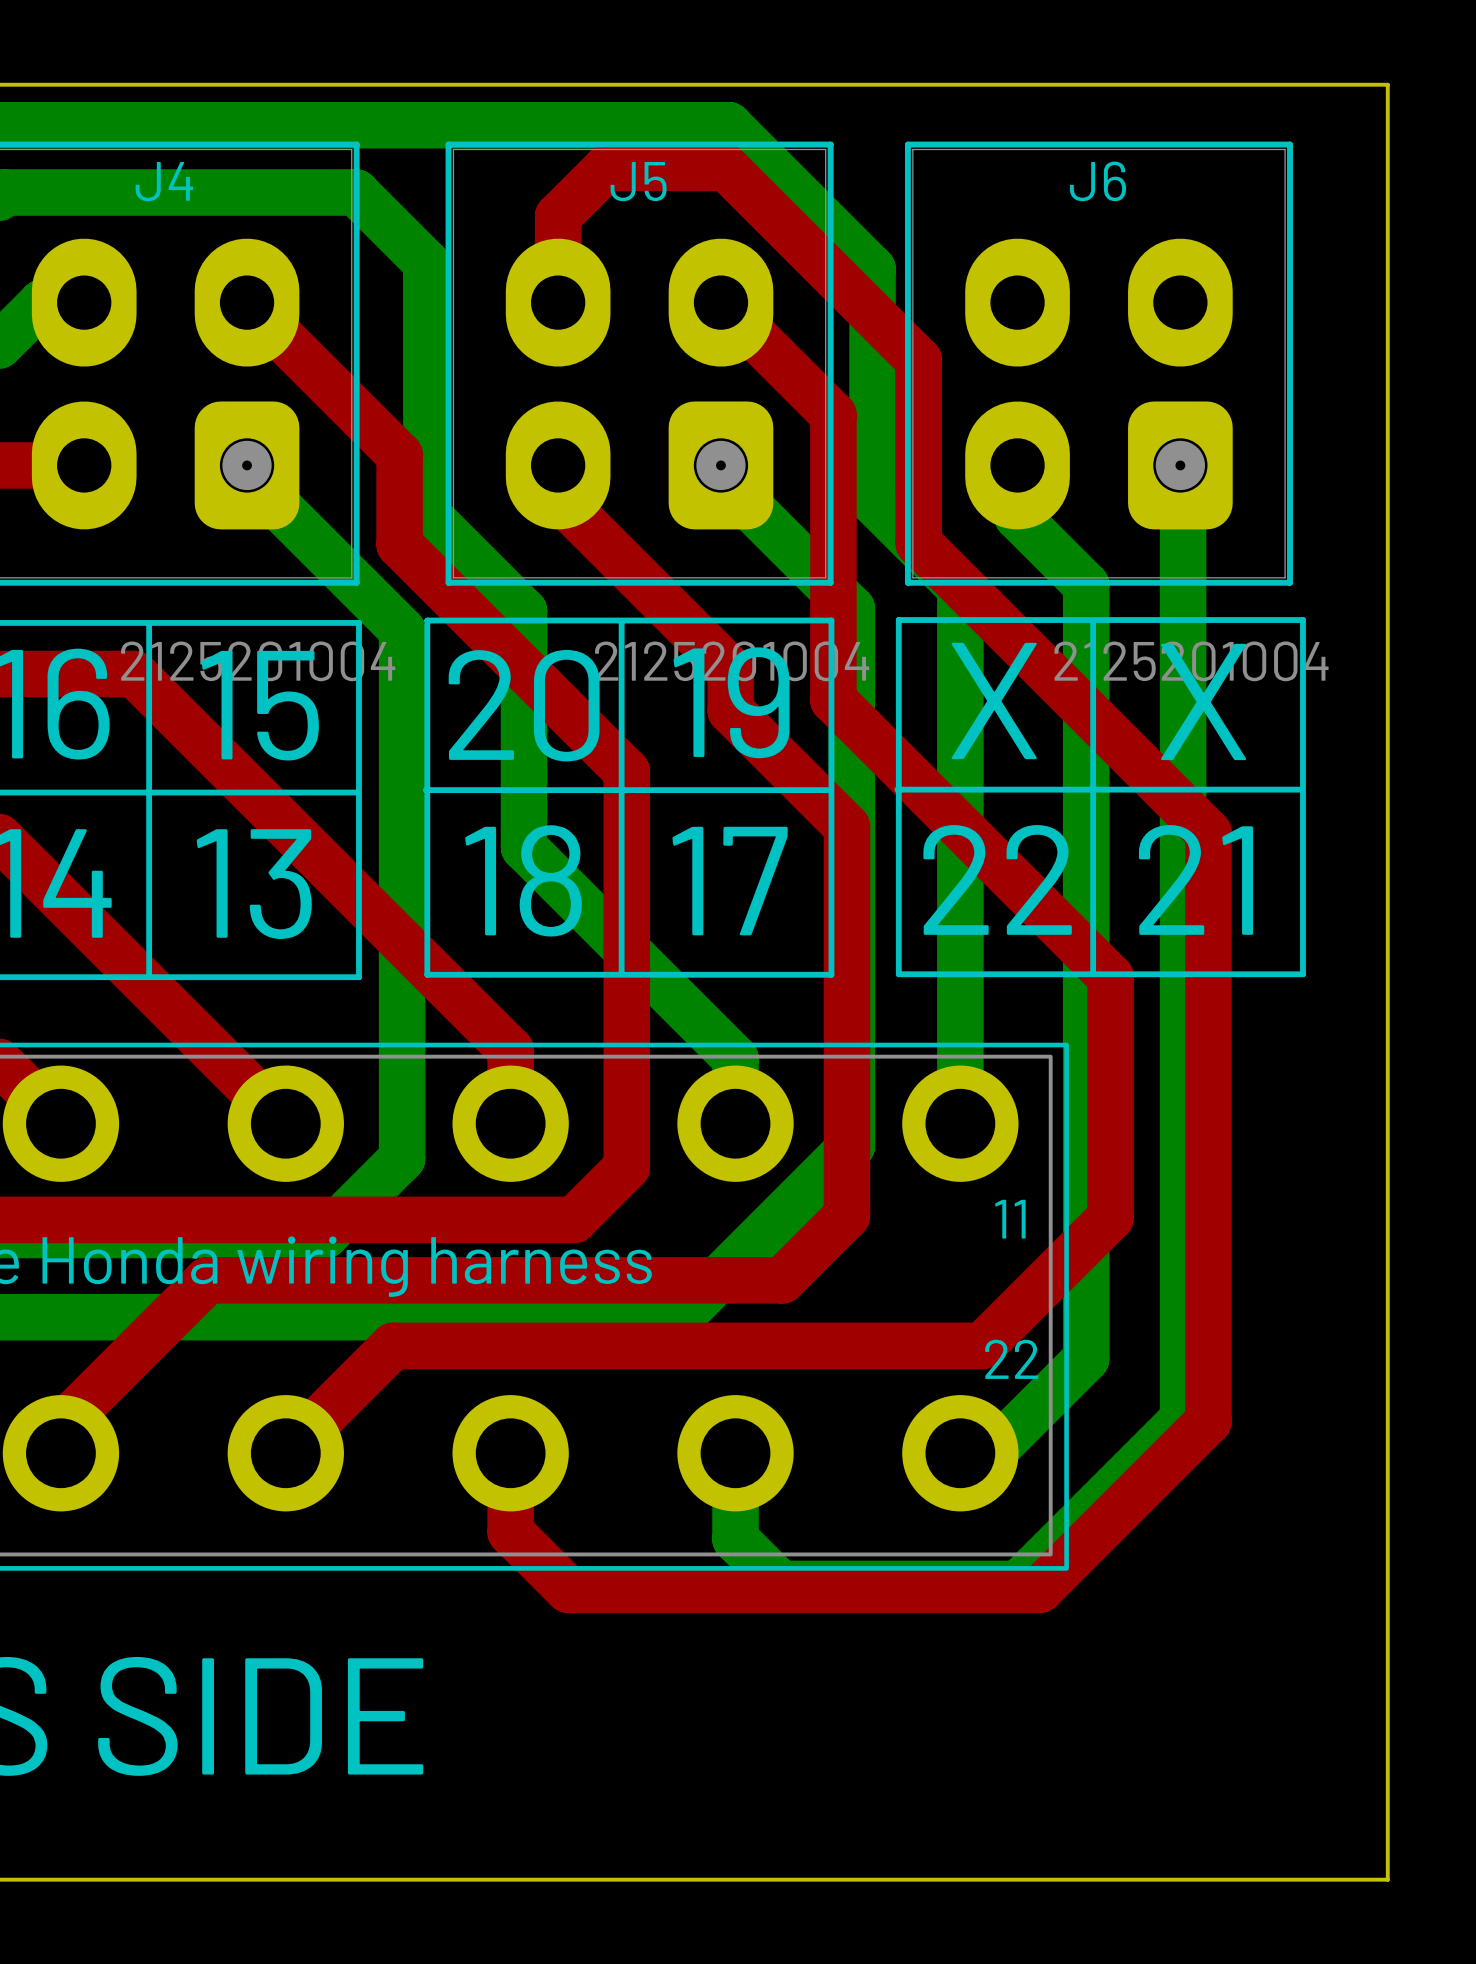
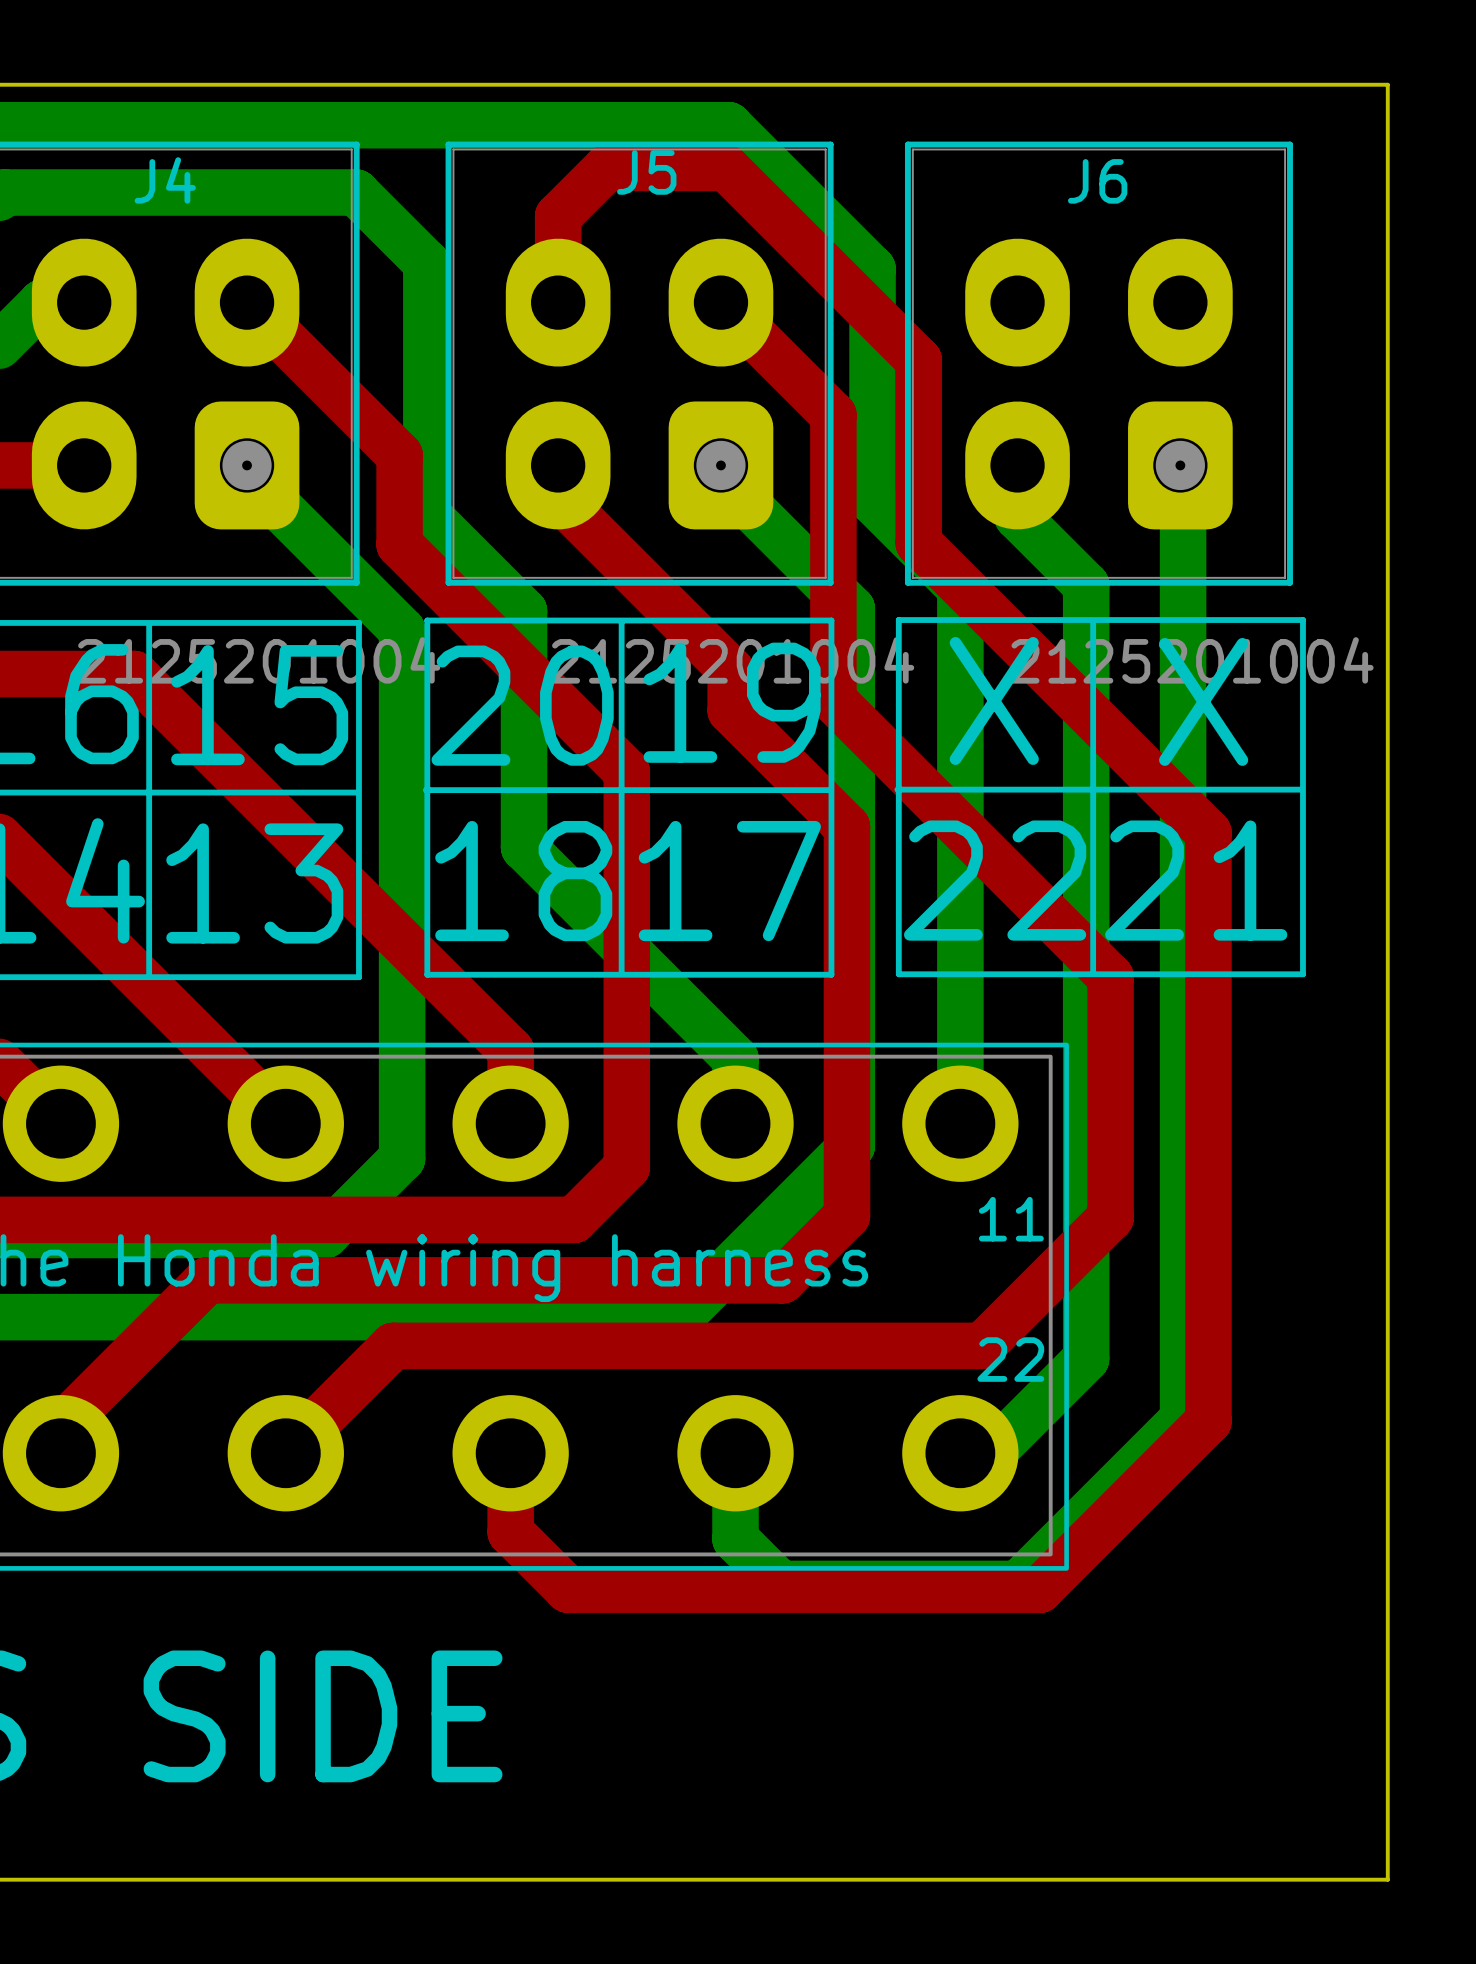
J5 name position: J5 (638, 181) -> J5 (646, 172)

